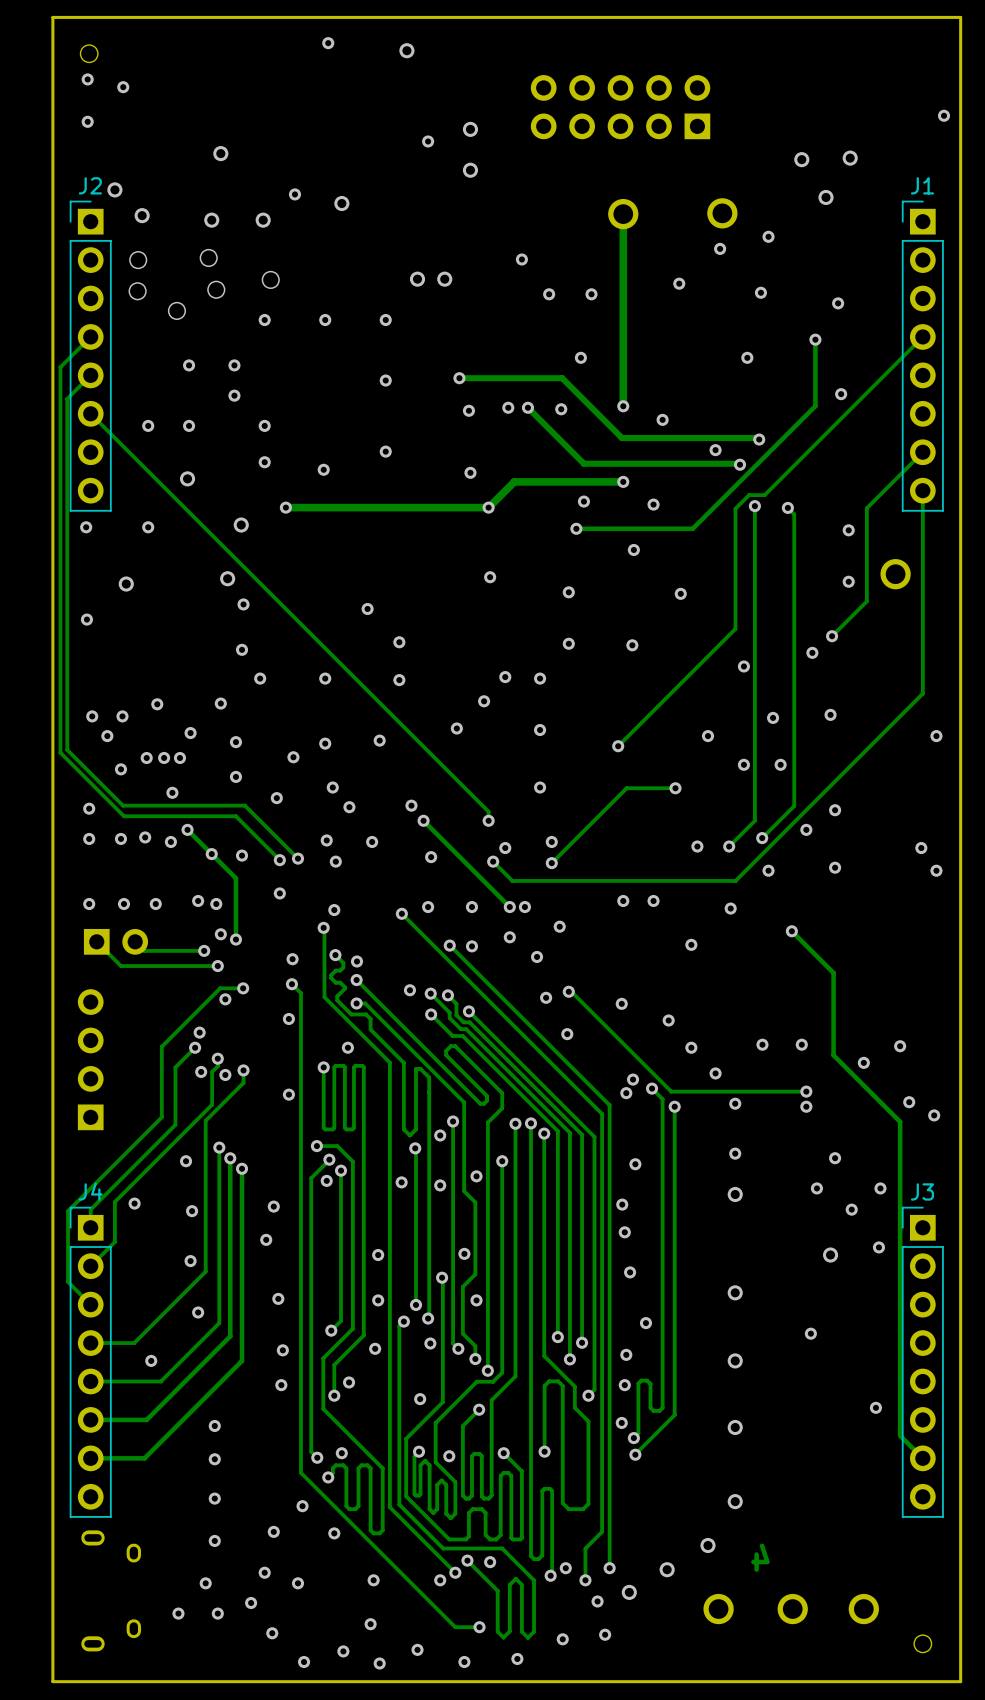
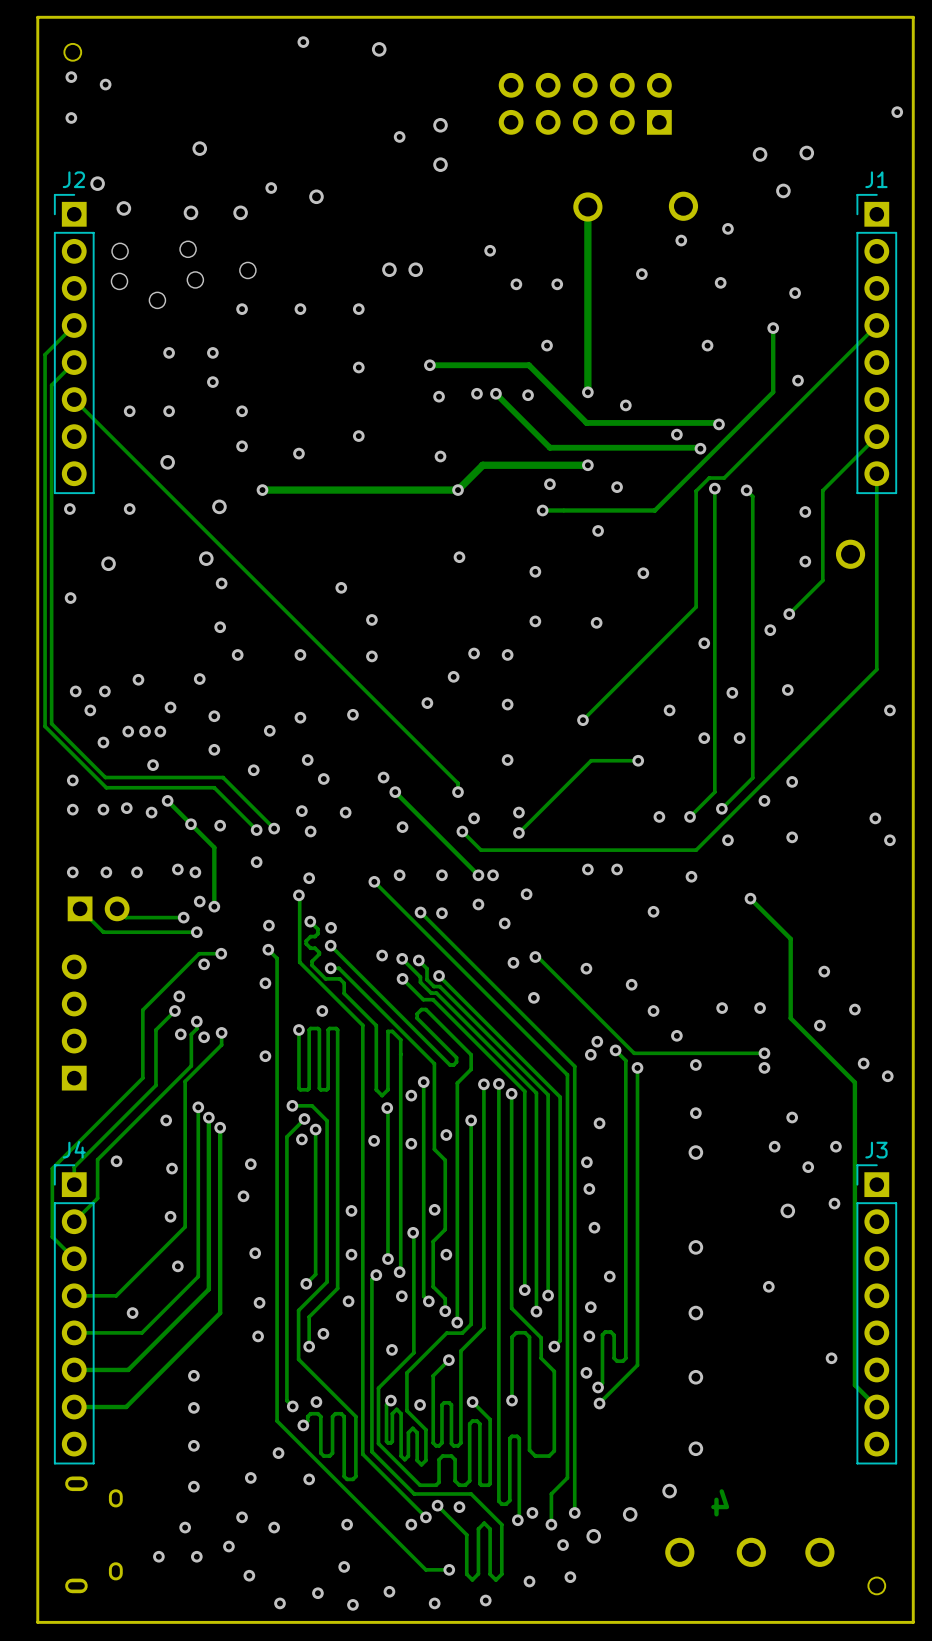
via: none -> (824, 971)

